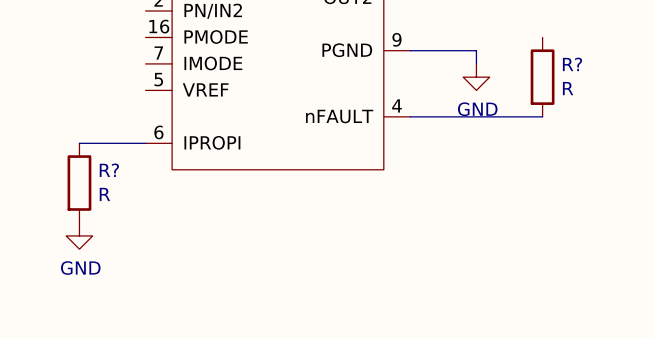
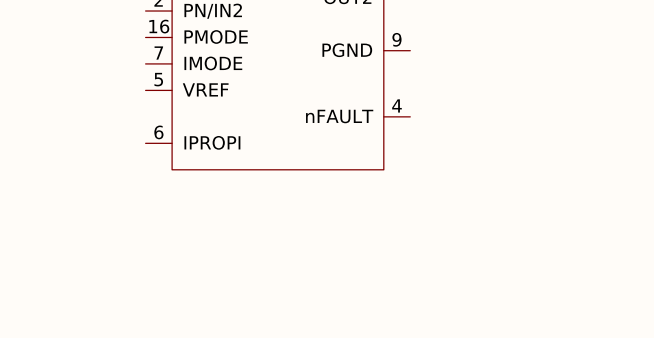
wire: (410, 50) (476, 50) (476, 63) -> none
power symbol: GND (476, 77) -> none
R?: R (542, 77) -> none
wire: (410, 116) (542, 116) -> none
wire: (79, 143) (145, 143) -> none
R?: R (79, 183) -> none
power symbol: GND (79, 235) -> none

